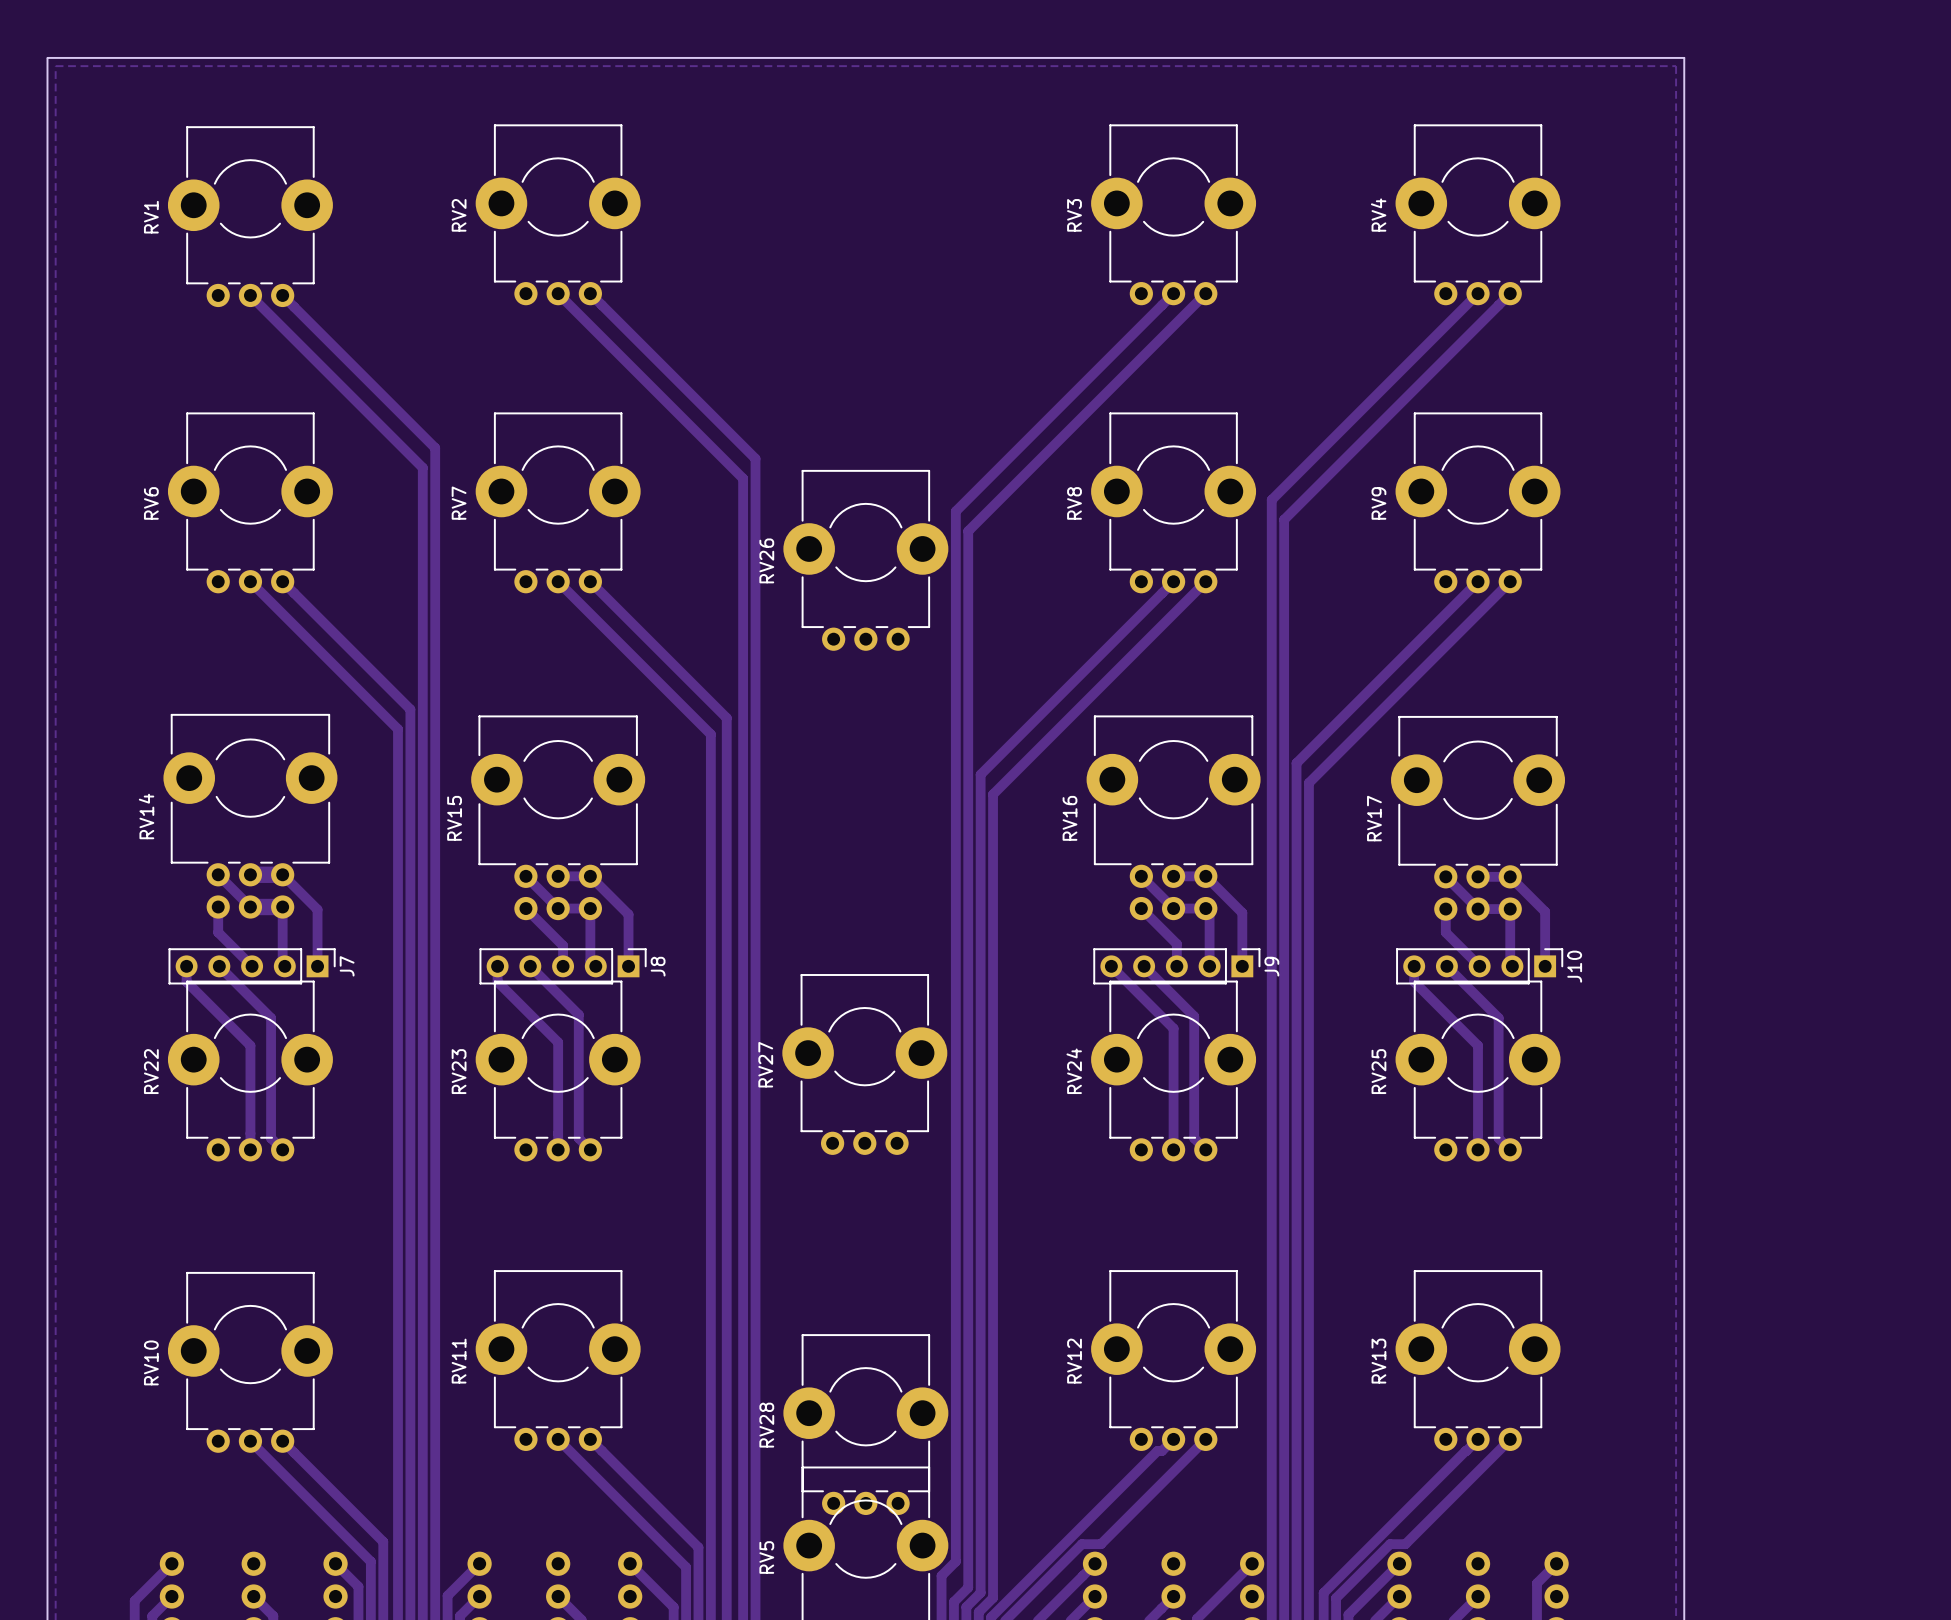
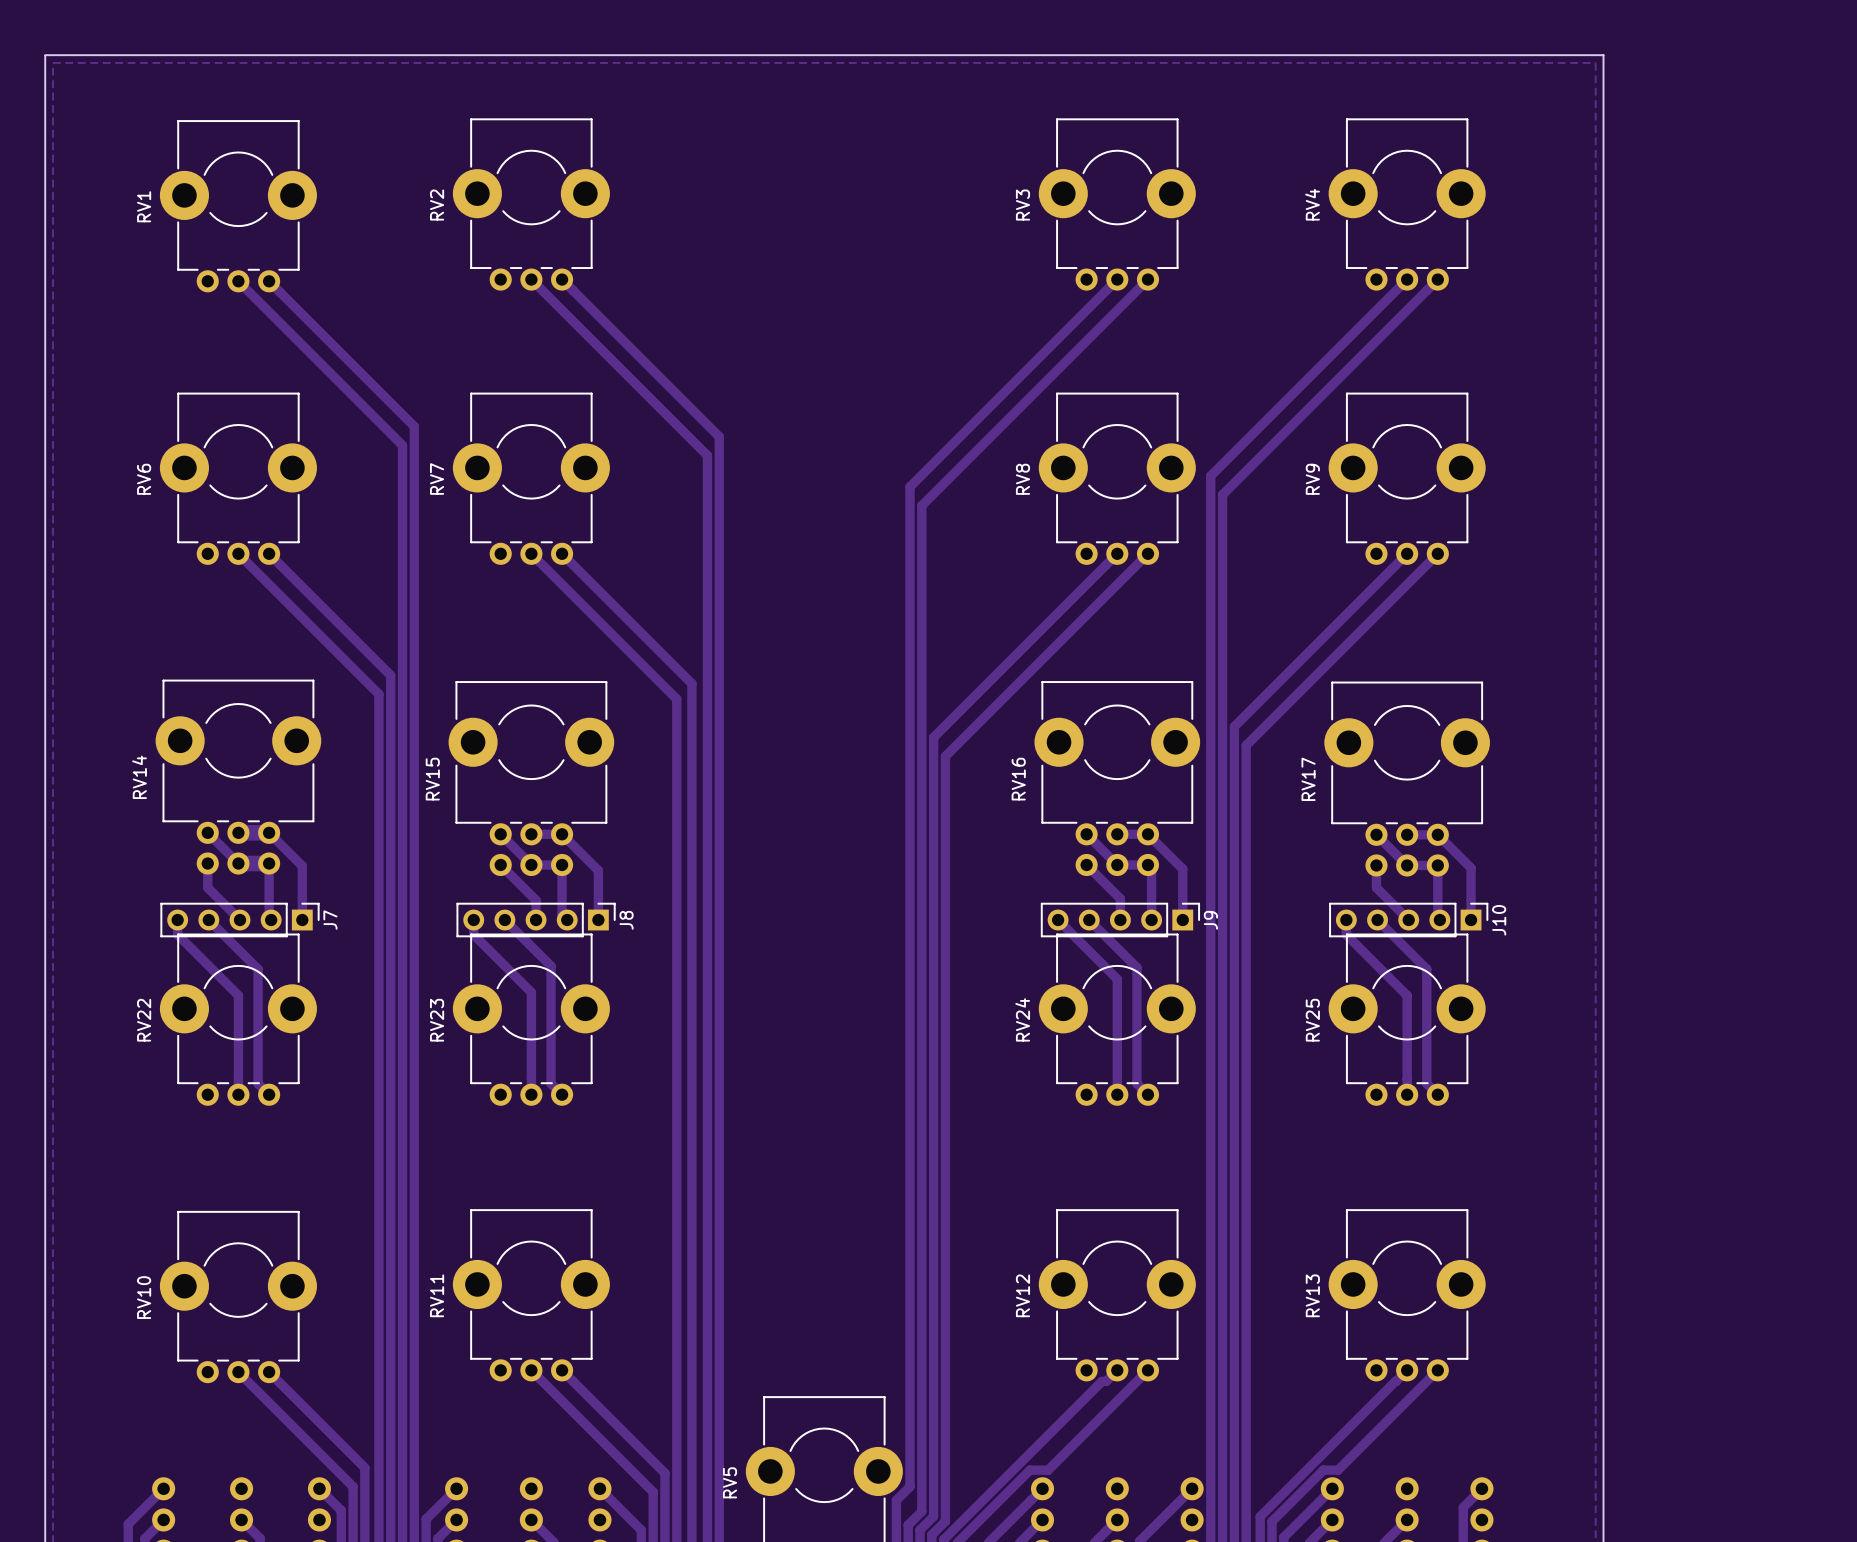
RV26: (865, 560) -> none
RV27: (864, 1064) -> none
RV28: (865, 1424) -> none

